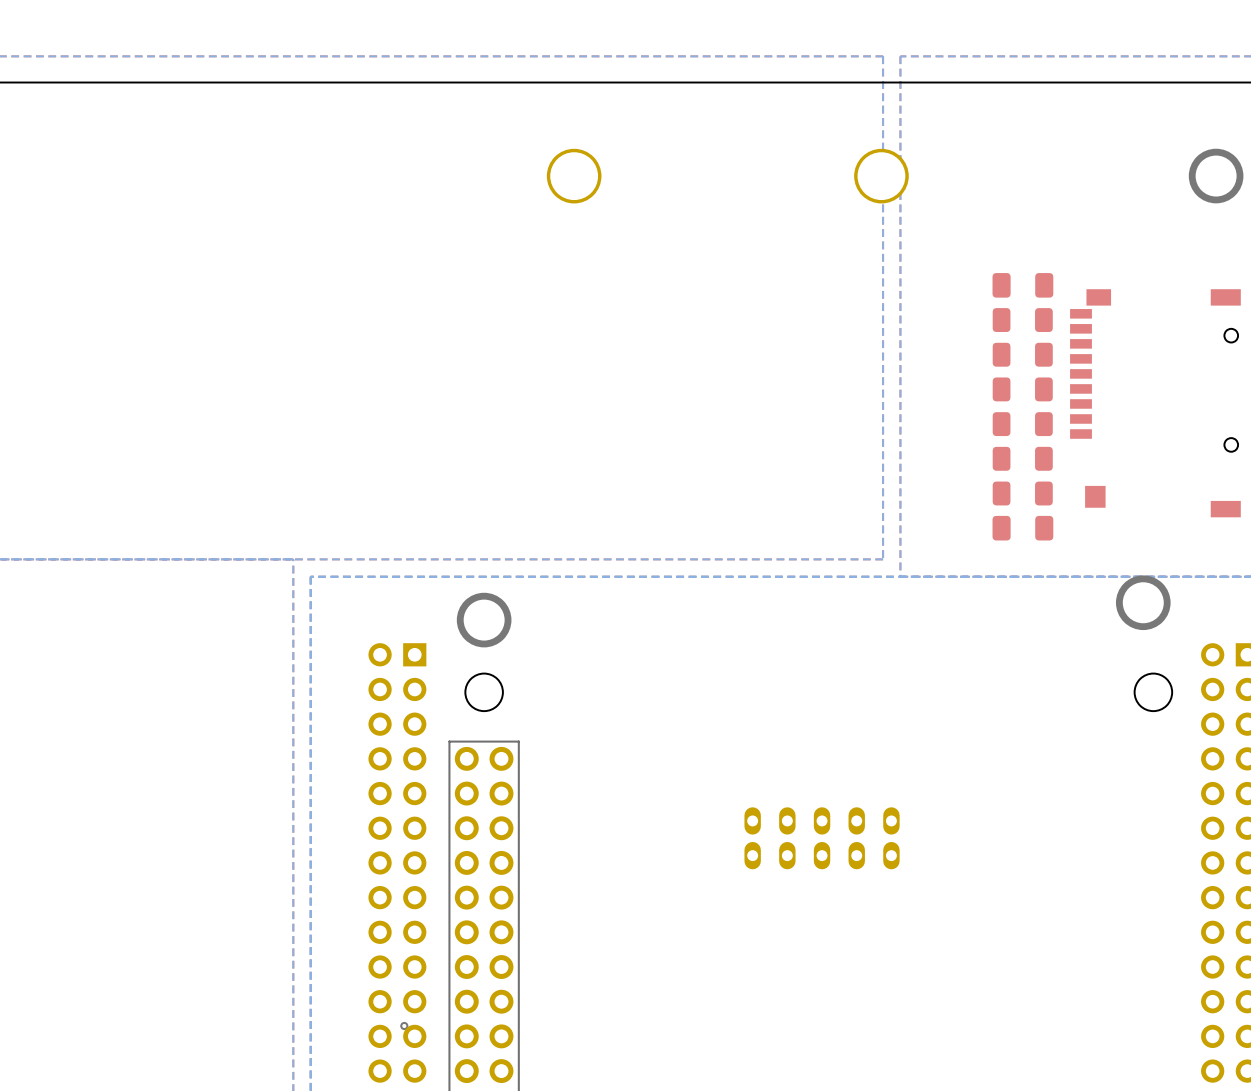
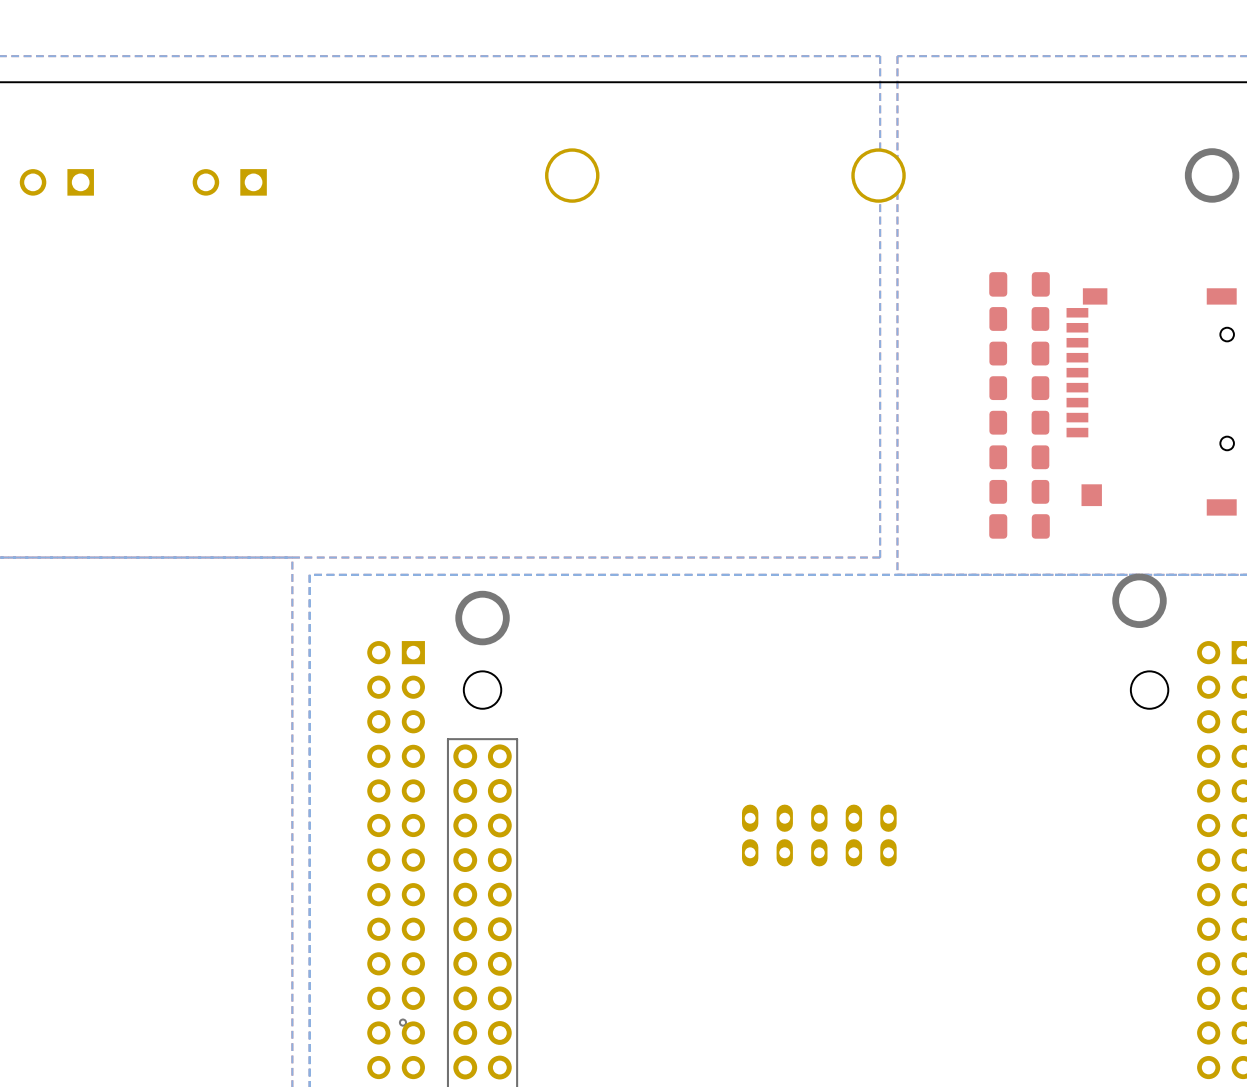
part: none -> (56, 182)
part: none -> (229, 182)

